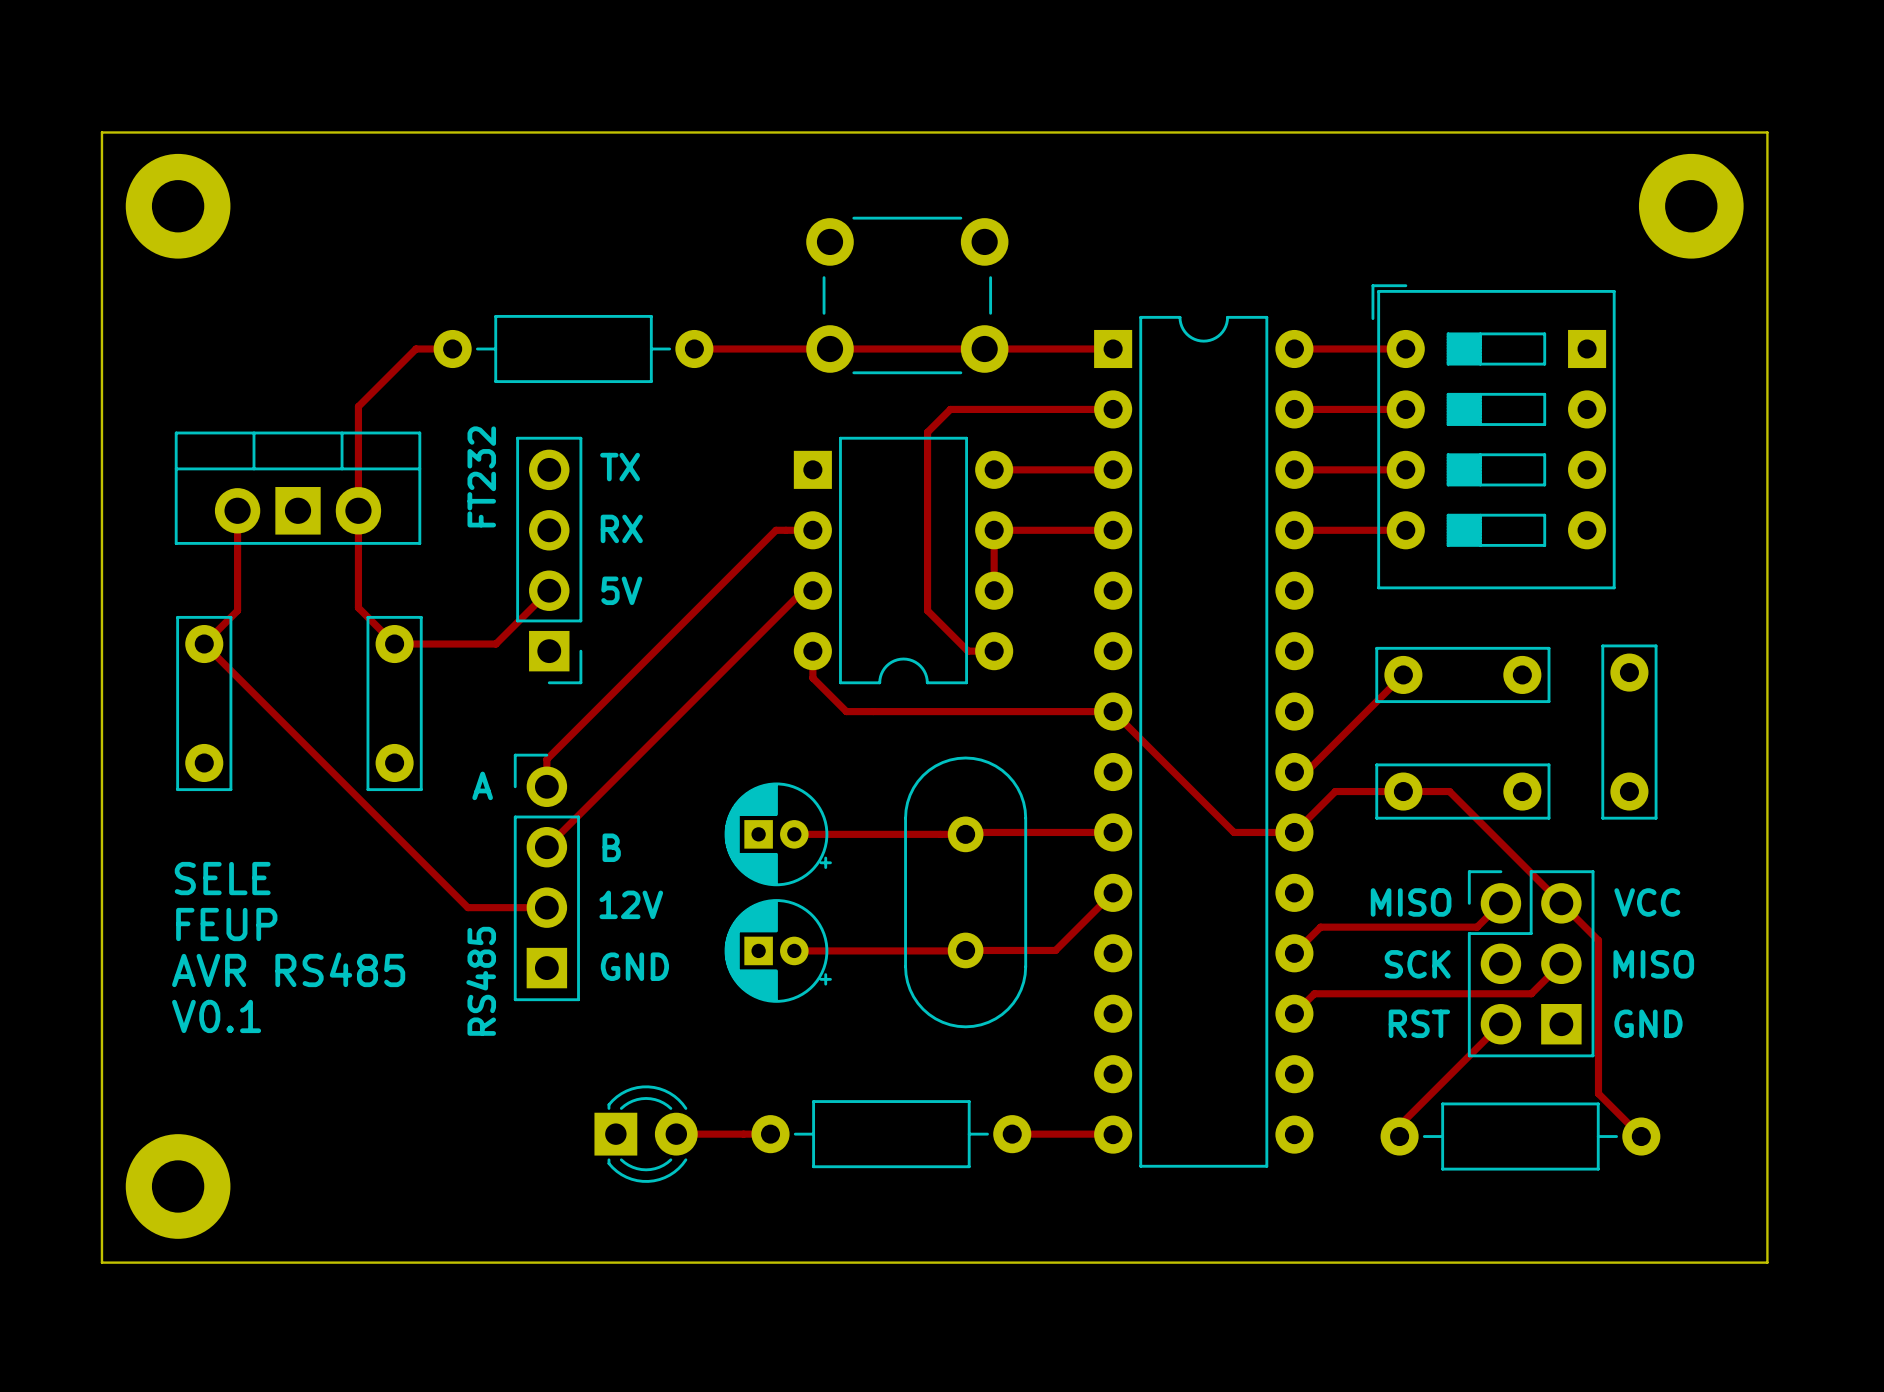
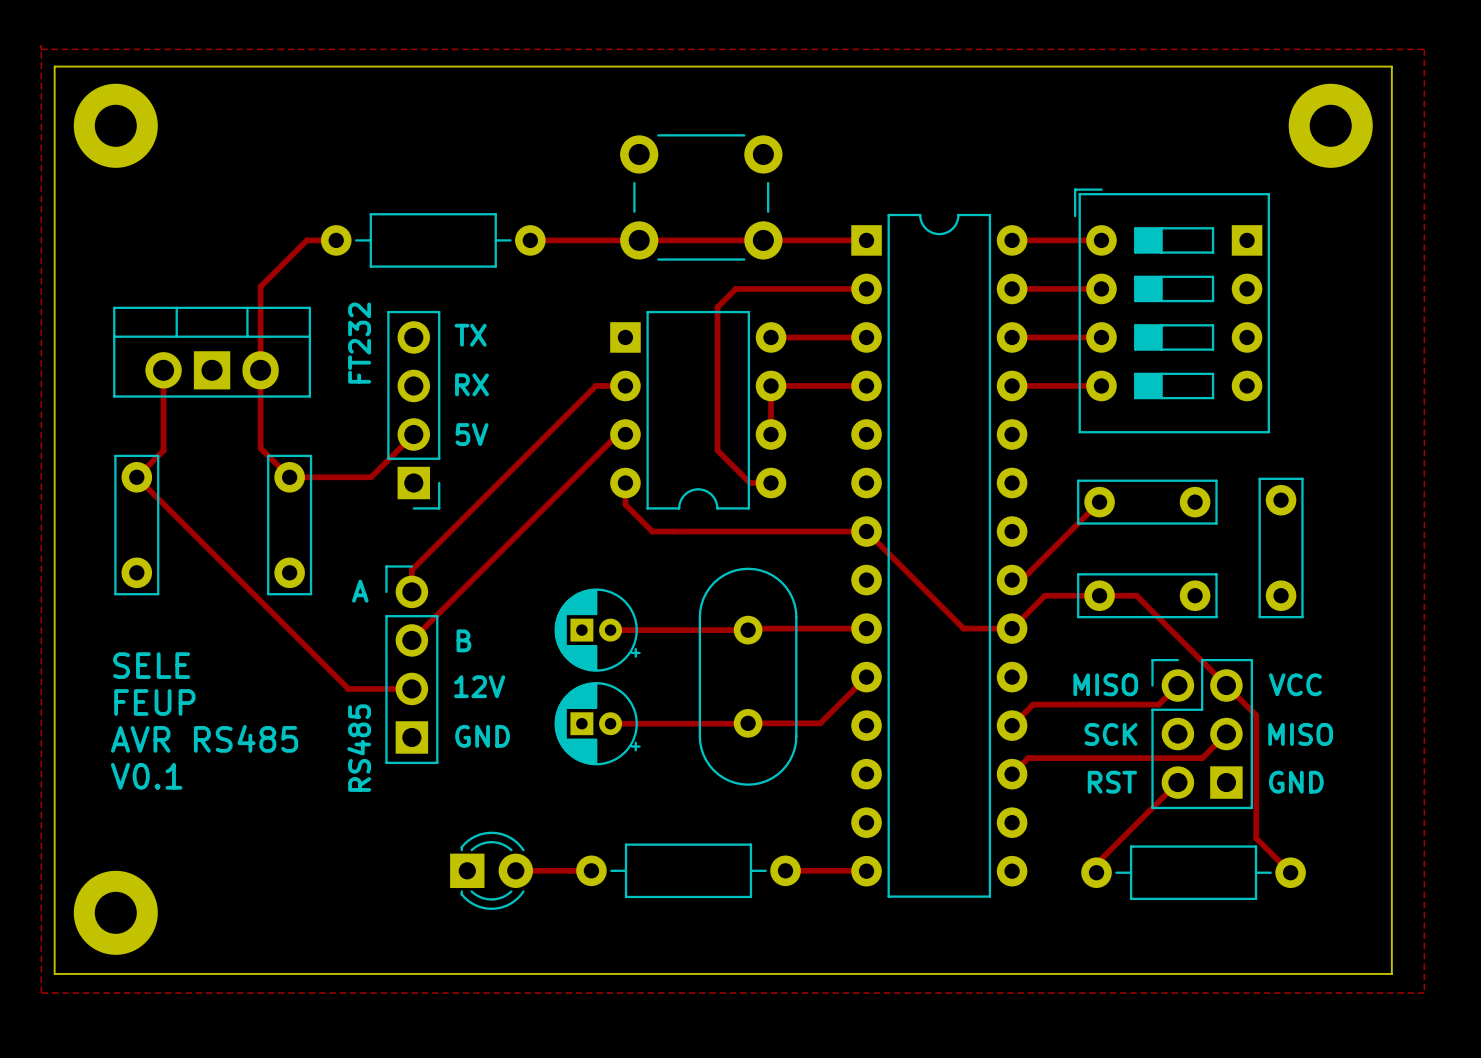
zone outline: none -> (41, 45) (41, 993) (1424, 993) (1424, 49) (41, 49)

